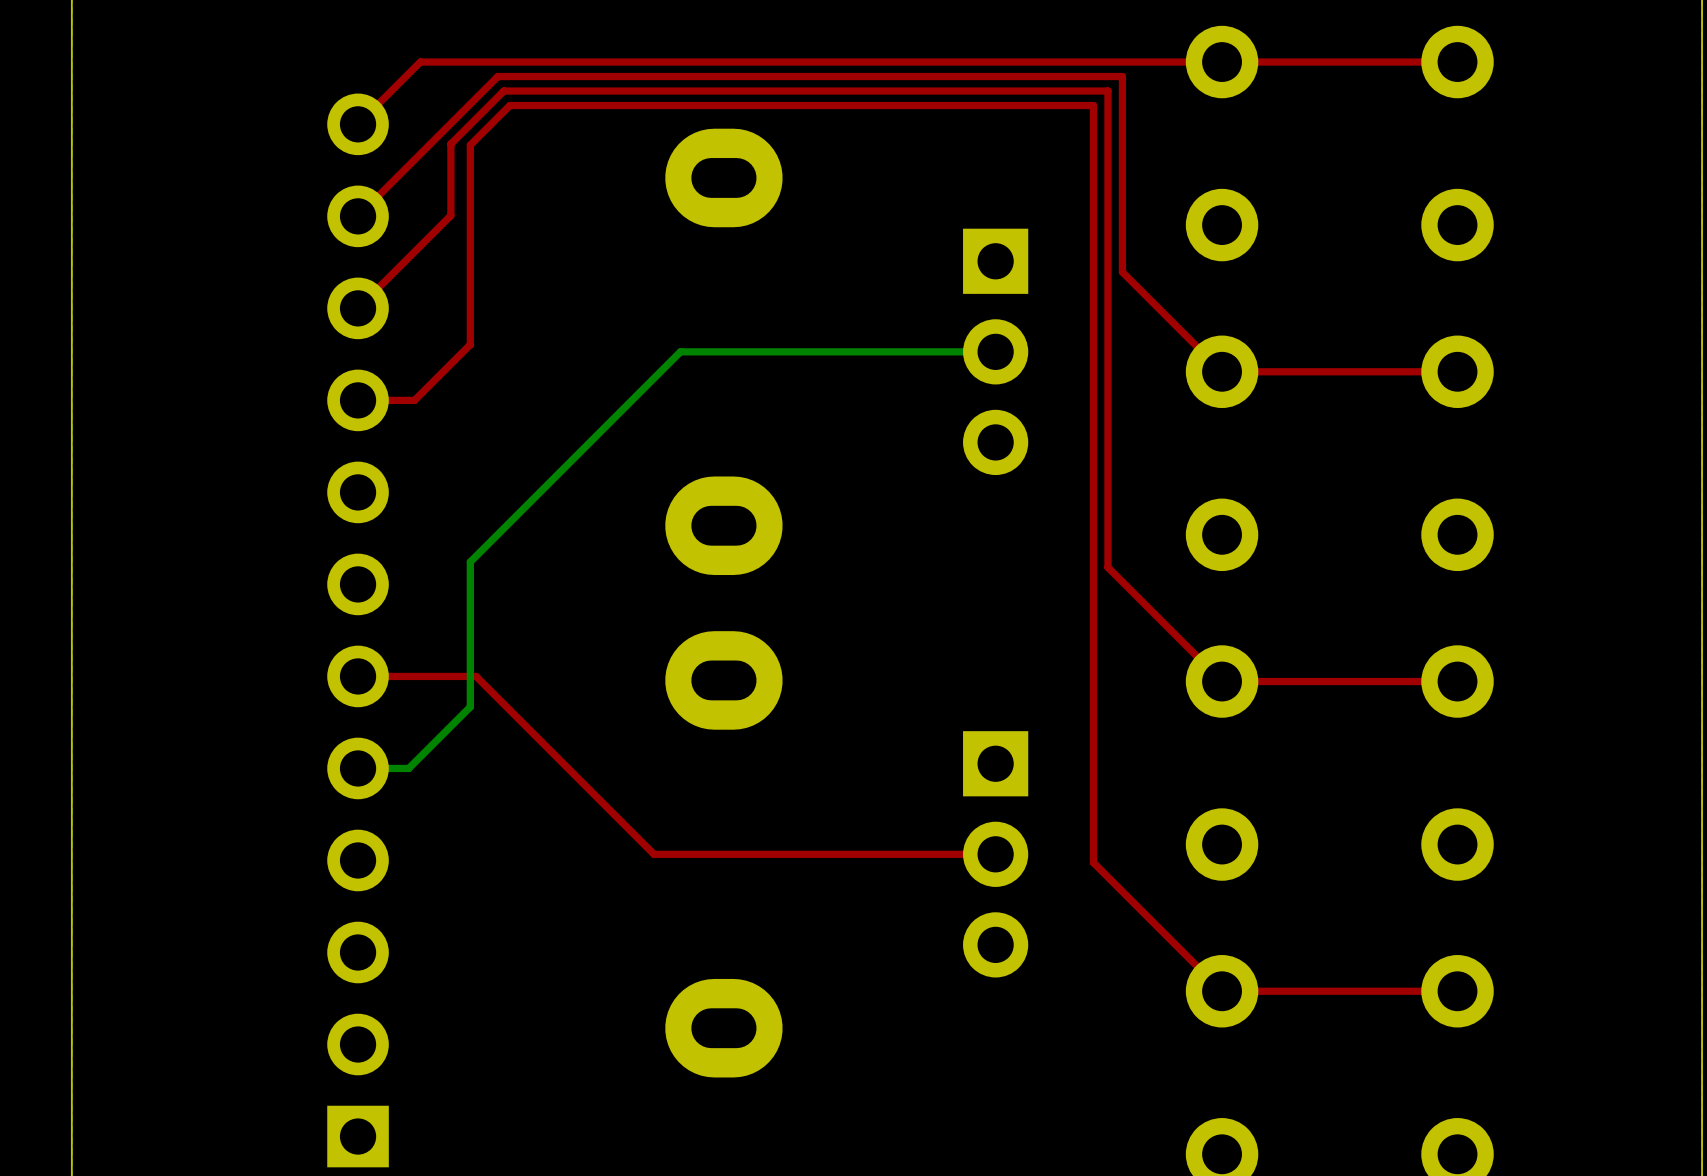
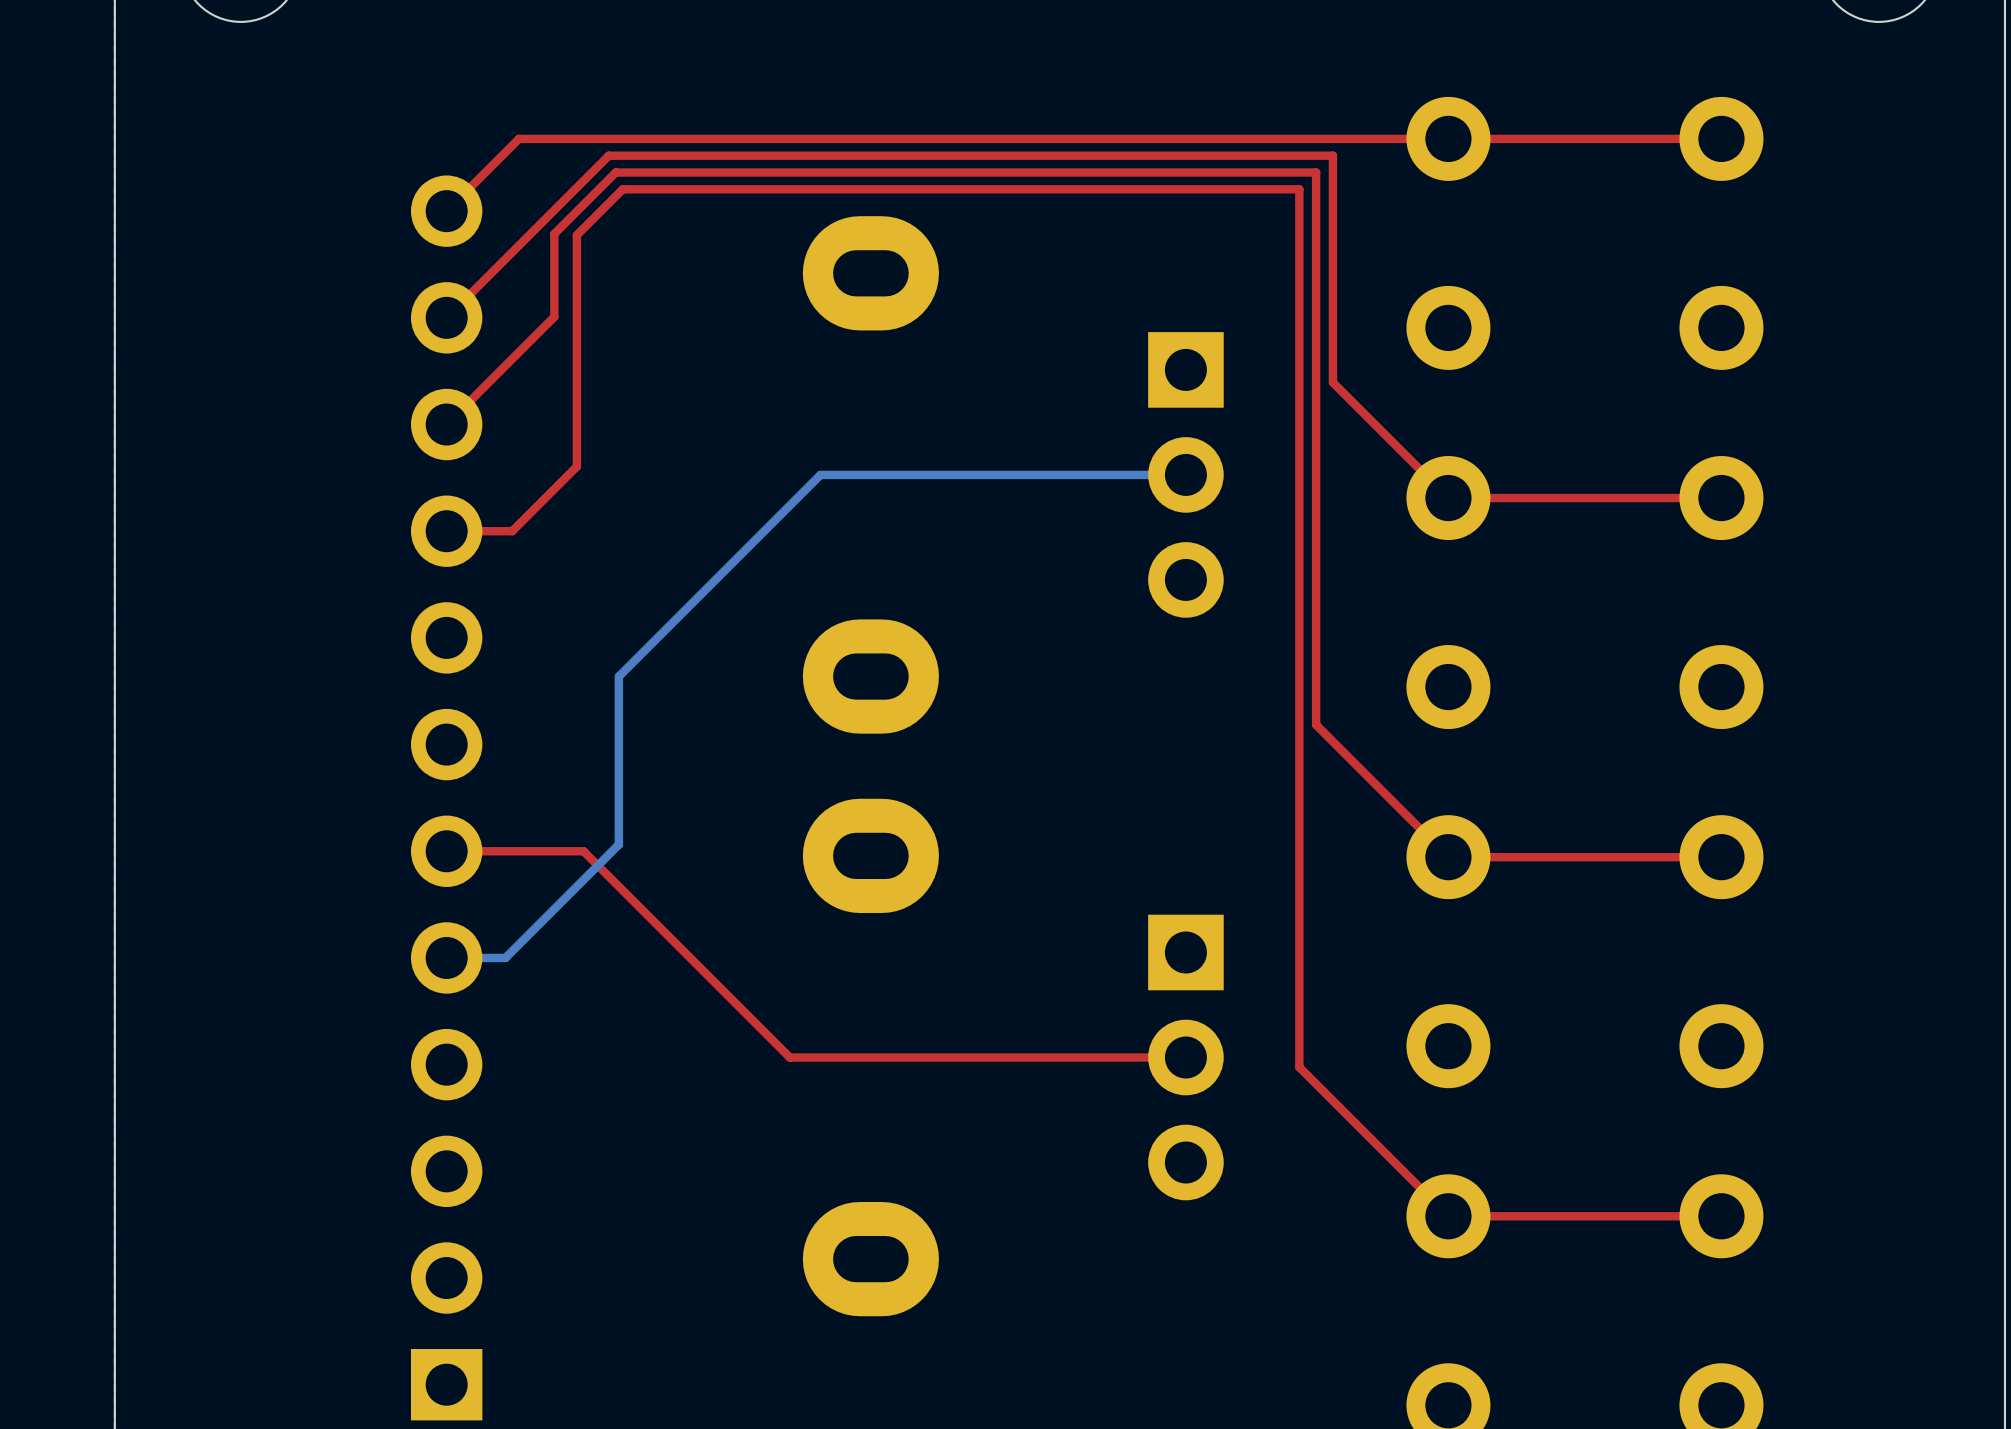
bottom track: (506, 525) (470, 561) (470, 706) -> (618, 676) (618, 844) (576, 886)

